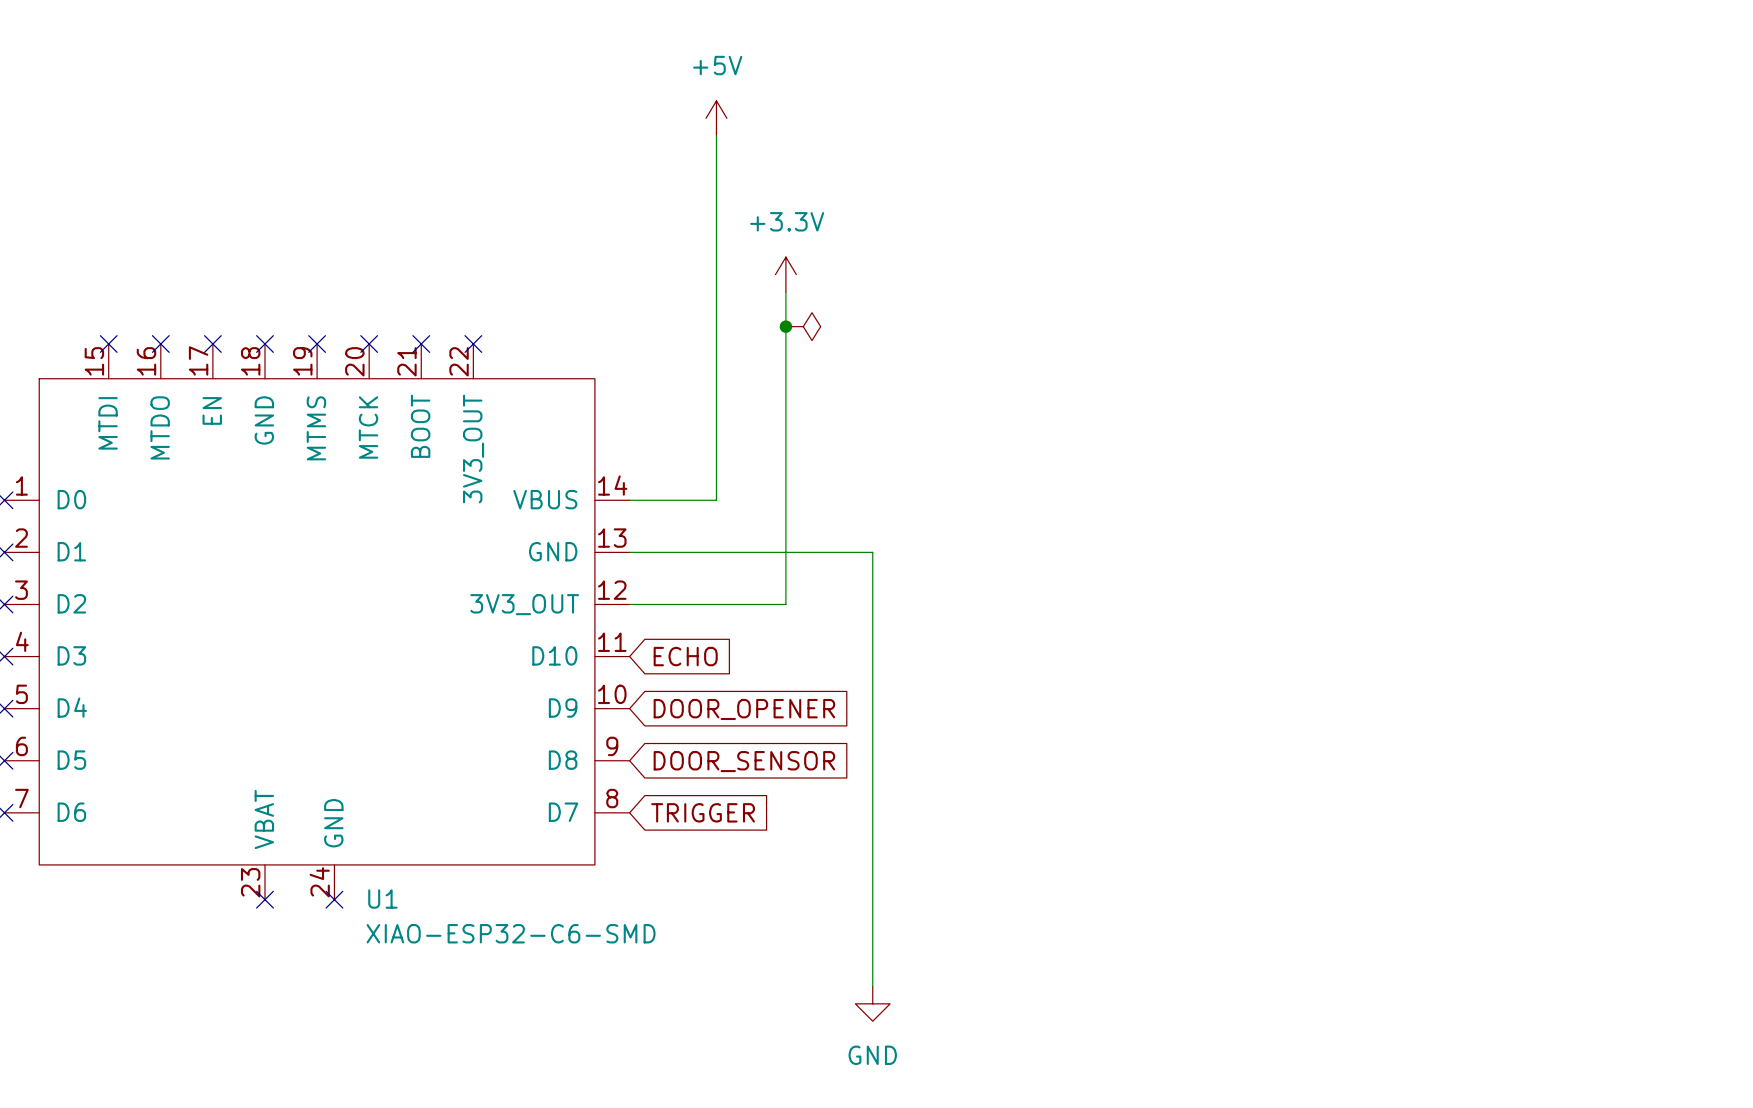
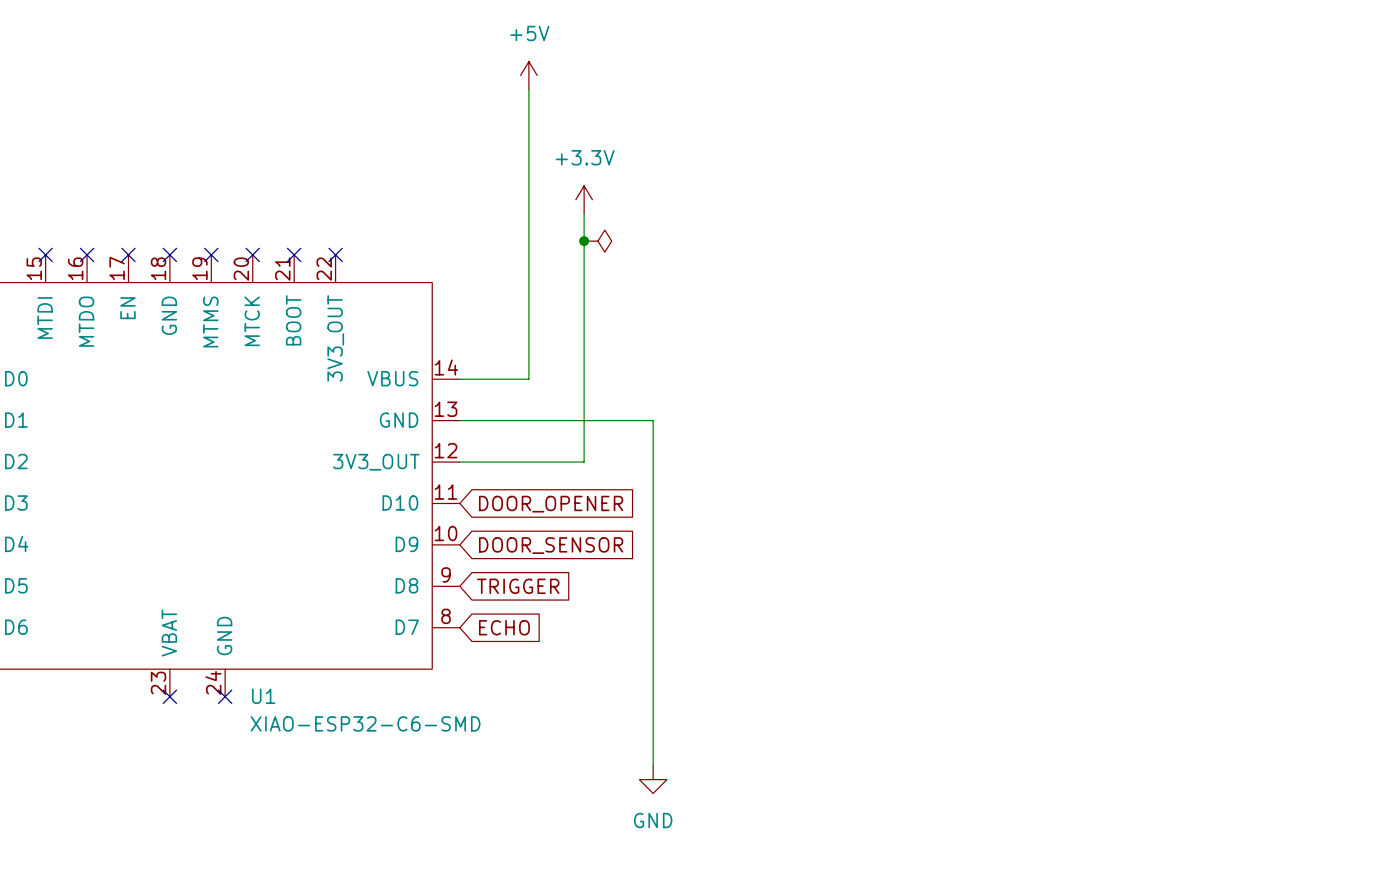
global label: ECHO (685, 656) -> DOOR_OPENER (551, 504)
global label: DOOR_OPENER (744, 709) -> DOOR_SENSOR (551, 545)
global label: DOOR_SENSOR (744, 761) -> TRIGGER (518, 586)
global label: TRIGGER (703, 812) -> ECHO (504, 627)

